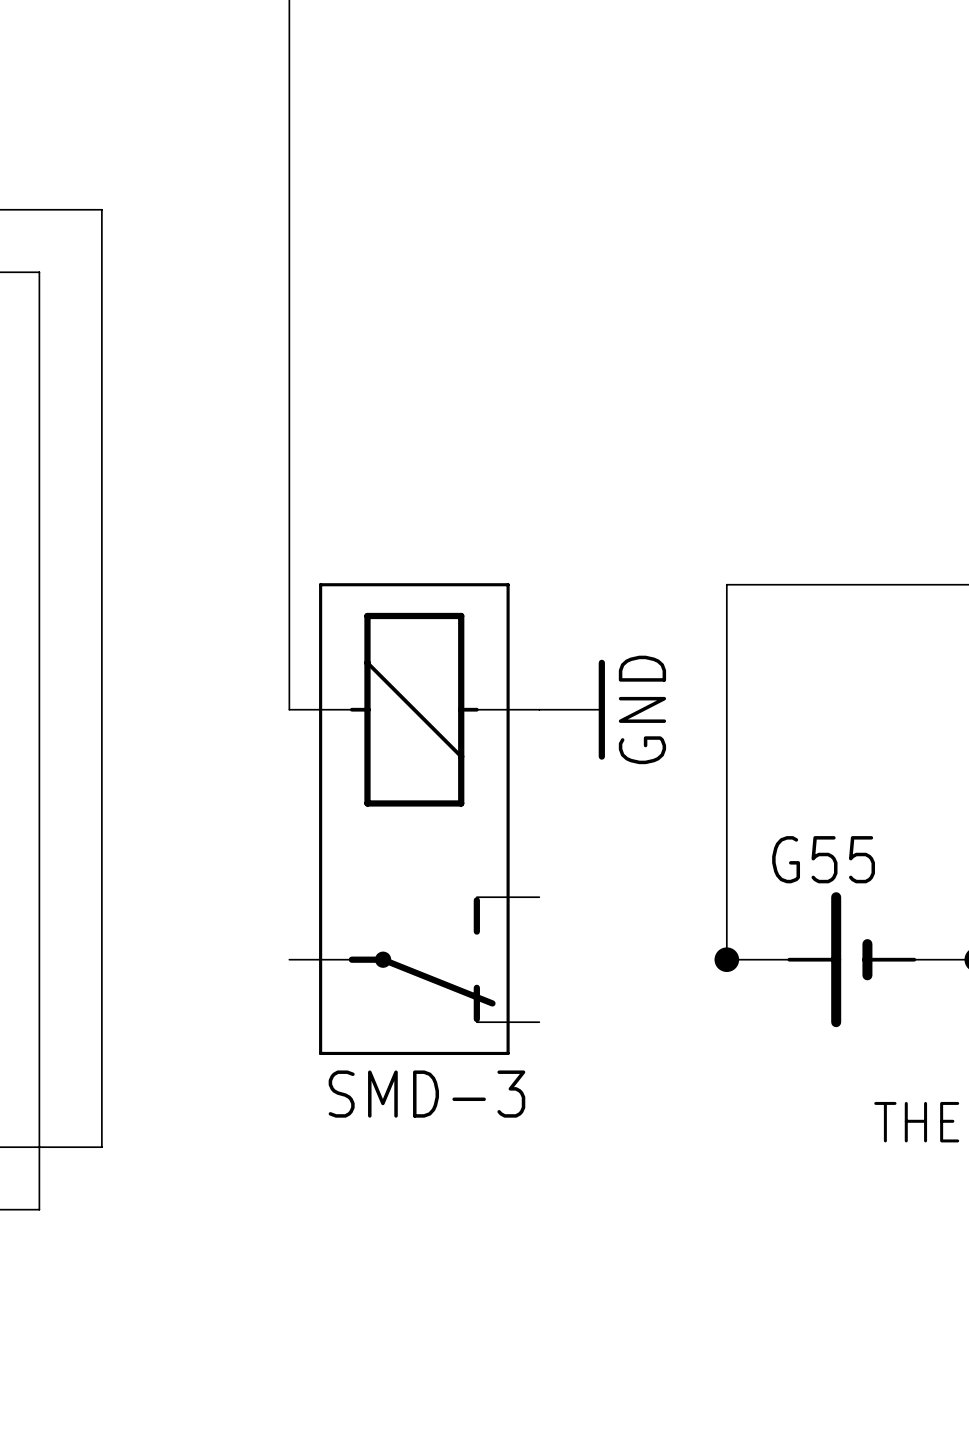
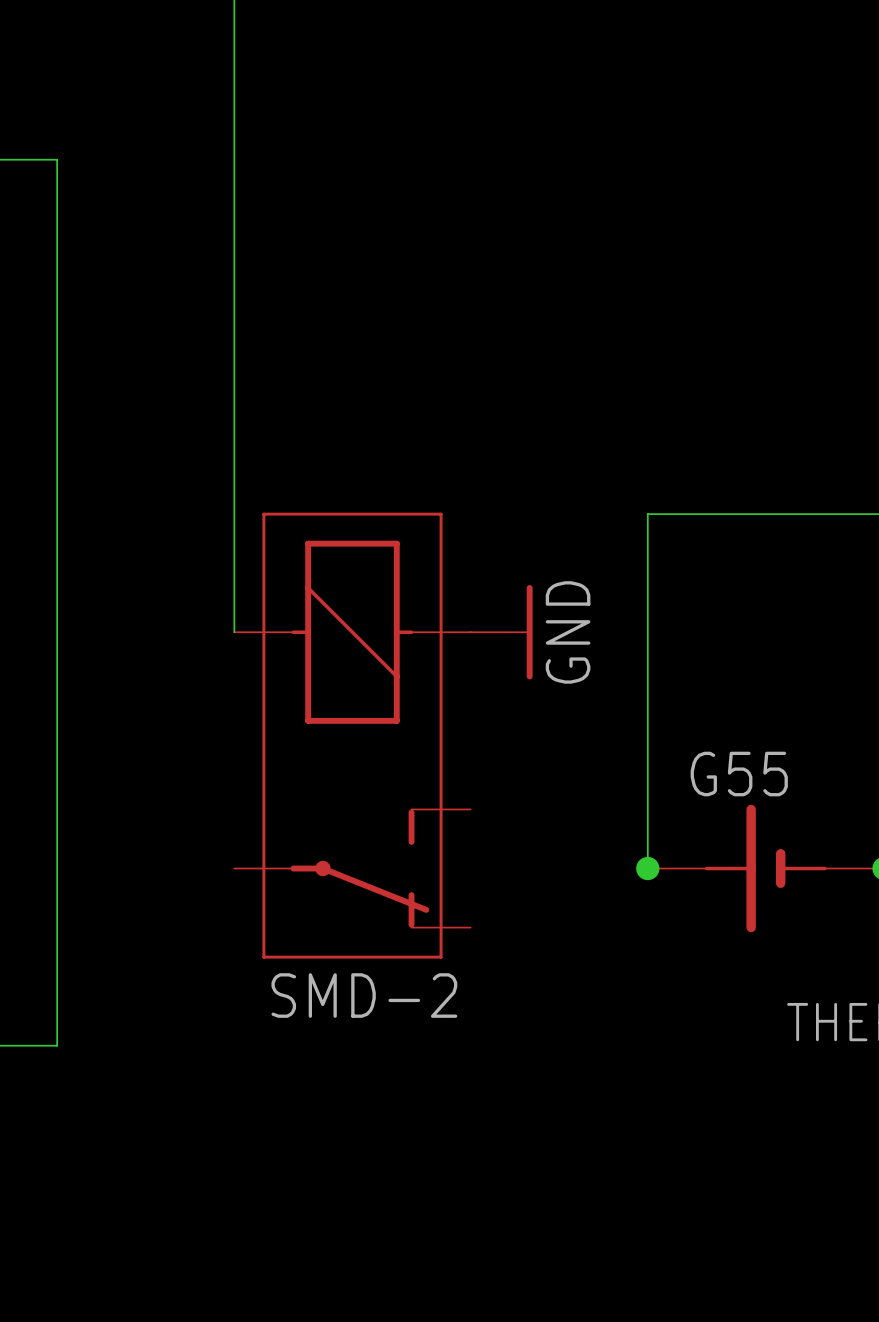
SMD-3 name: SMD-3 (426, 1094) -> SMD-2 (364, 995)

